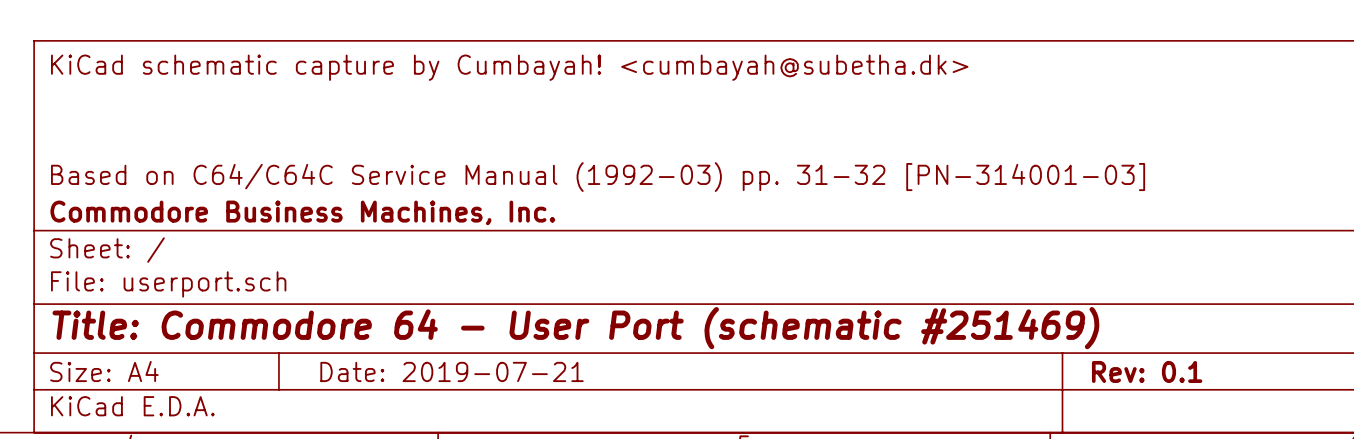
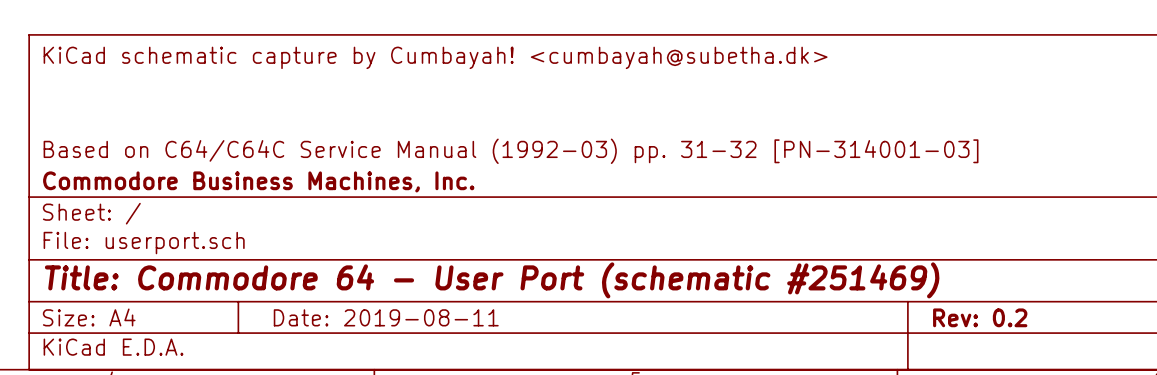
title block: Date: 2019-07-21 (452, 371) -> Date: 2019-08-11 (386, 317)
title block: Rev: 0.1 (1147, 371) -> Rev: 0.2 (980, 317)

